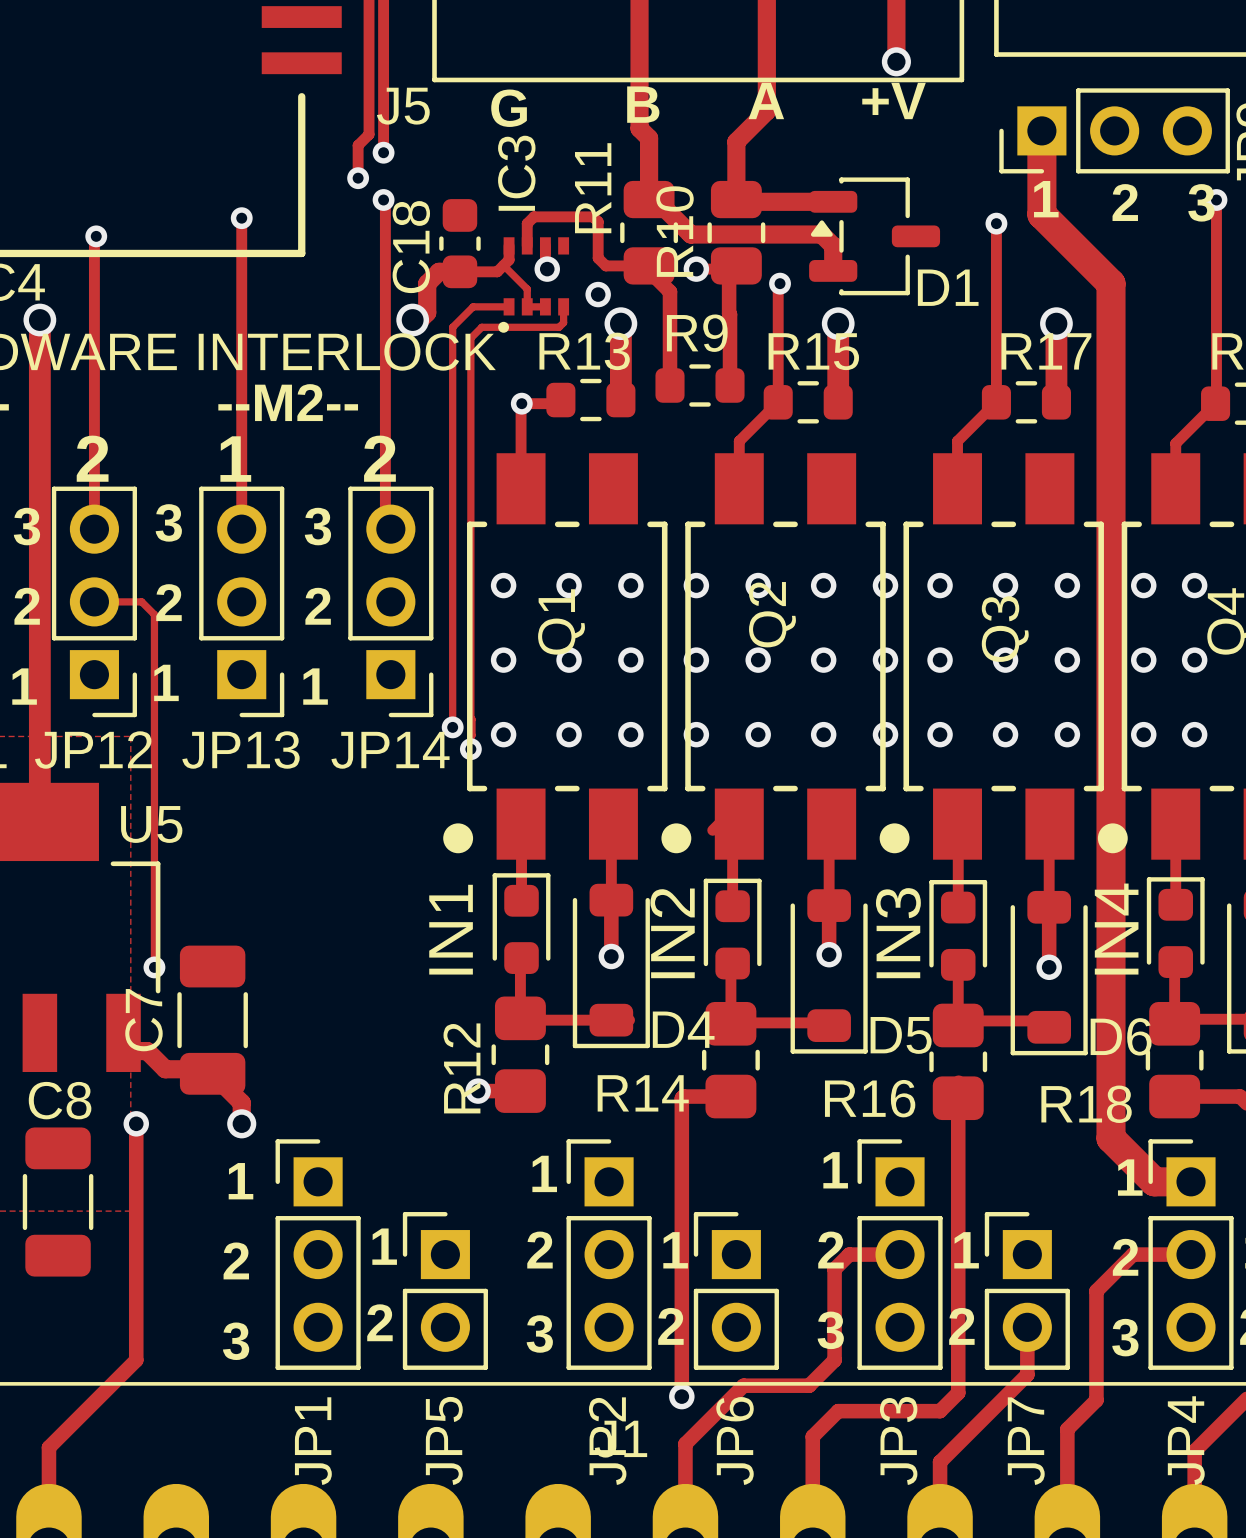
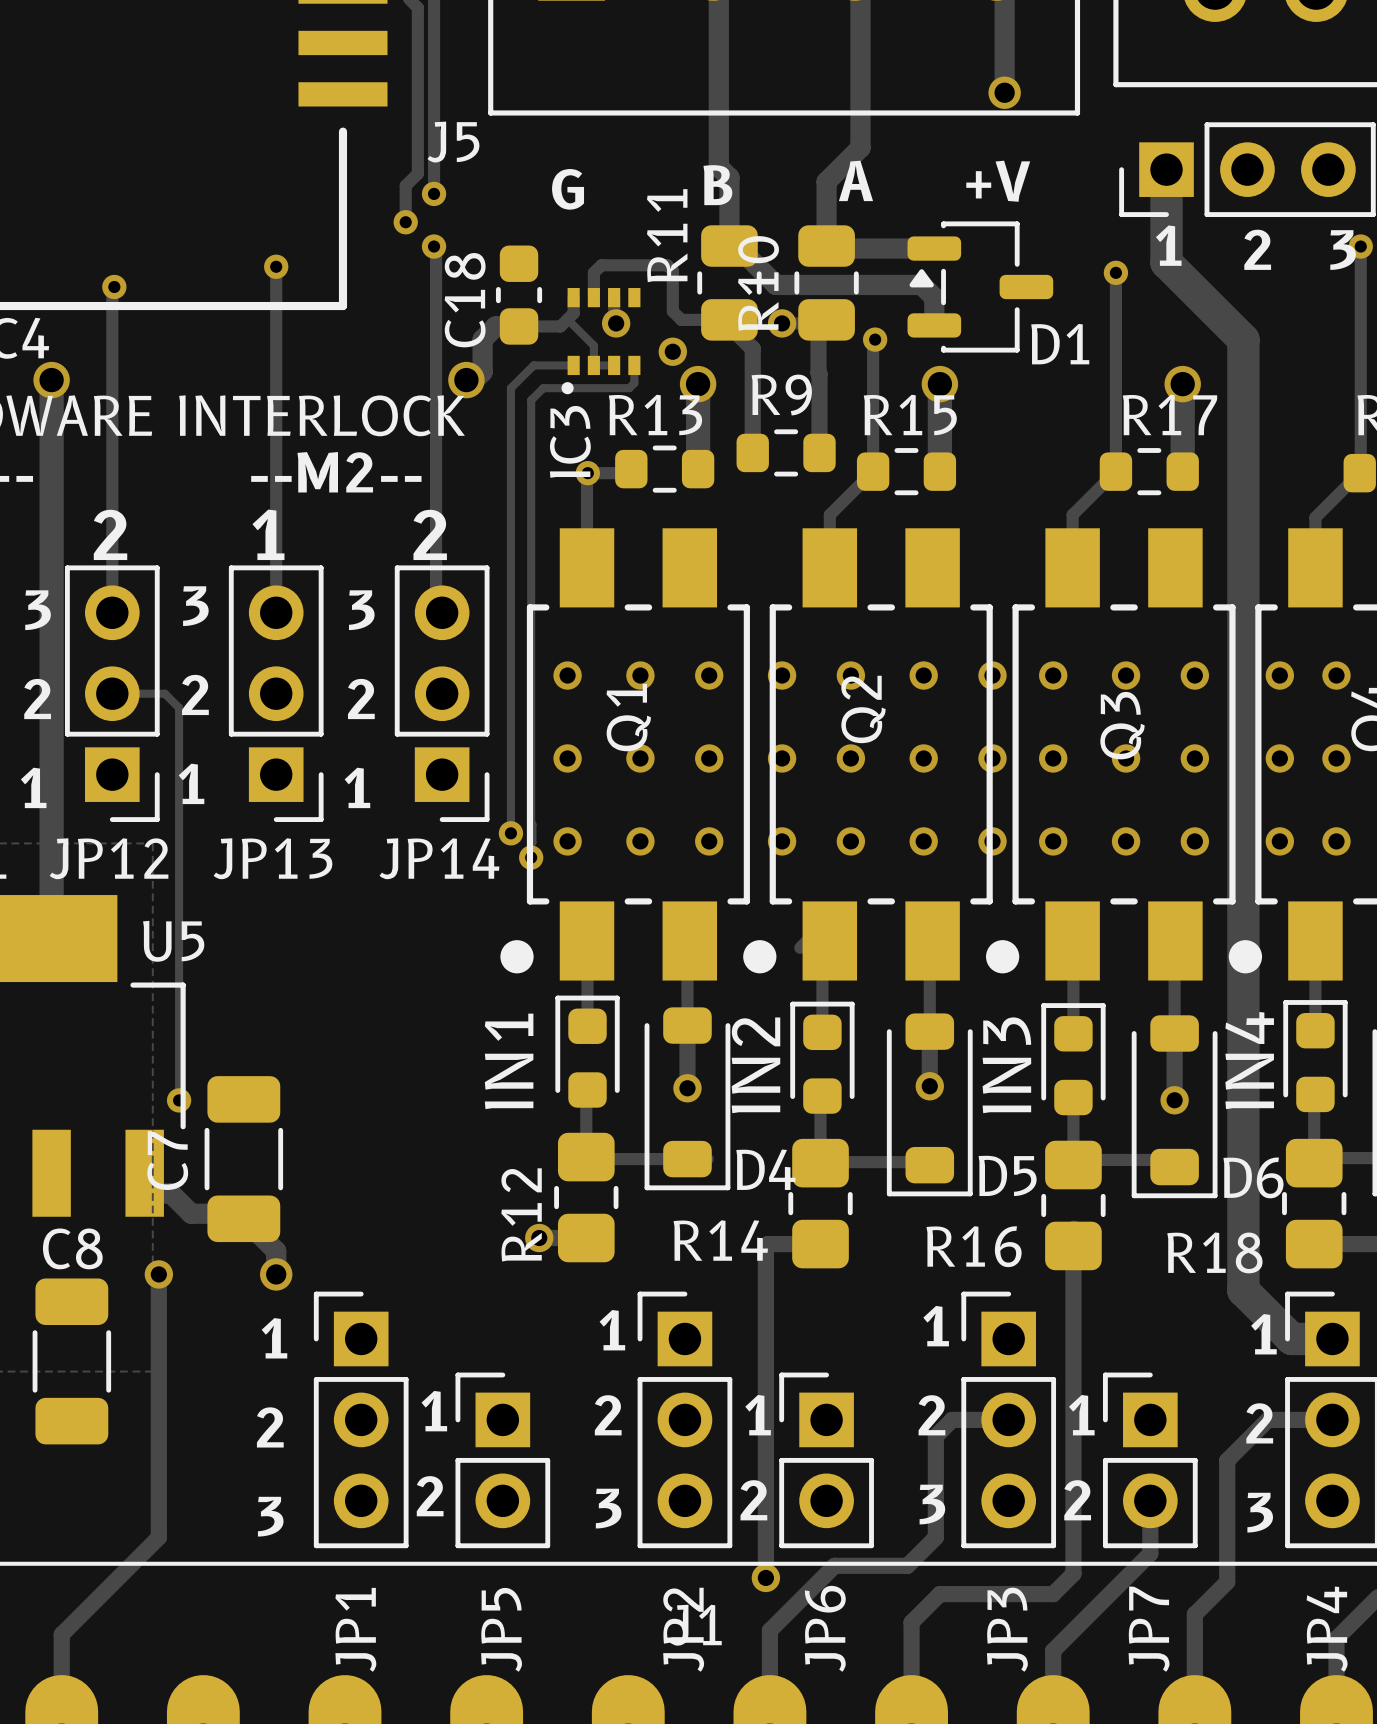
text position: A (766, 100) -> A (855, 180)
text position: +V (894, 100) -> +V (998, 181)
text position: B (643, 104) -> B (717, 185)
text position: G (509, 108) -> G (568, 189)
IC3 name position: IC3 (516, 173) -> IC3 (570, 441)

